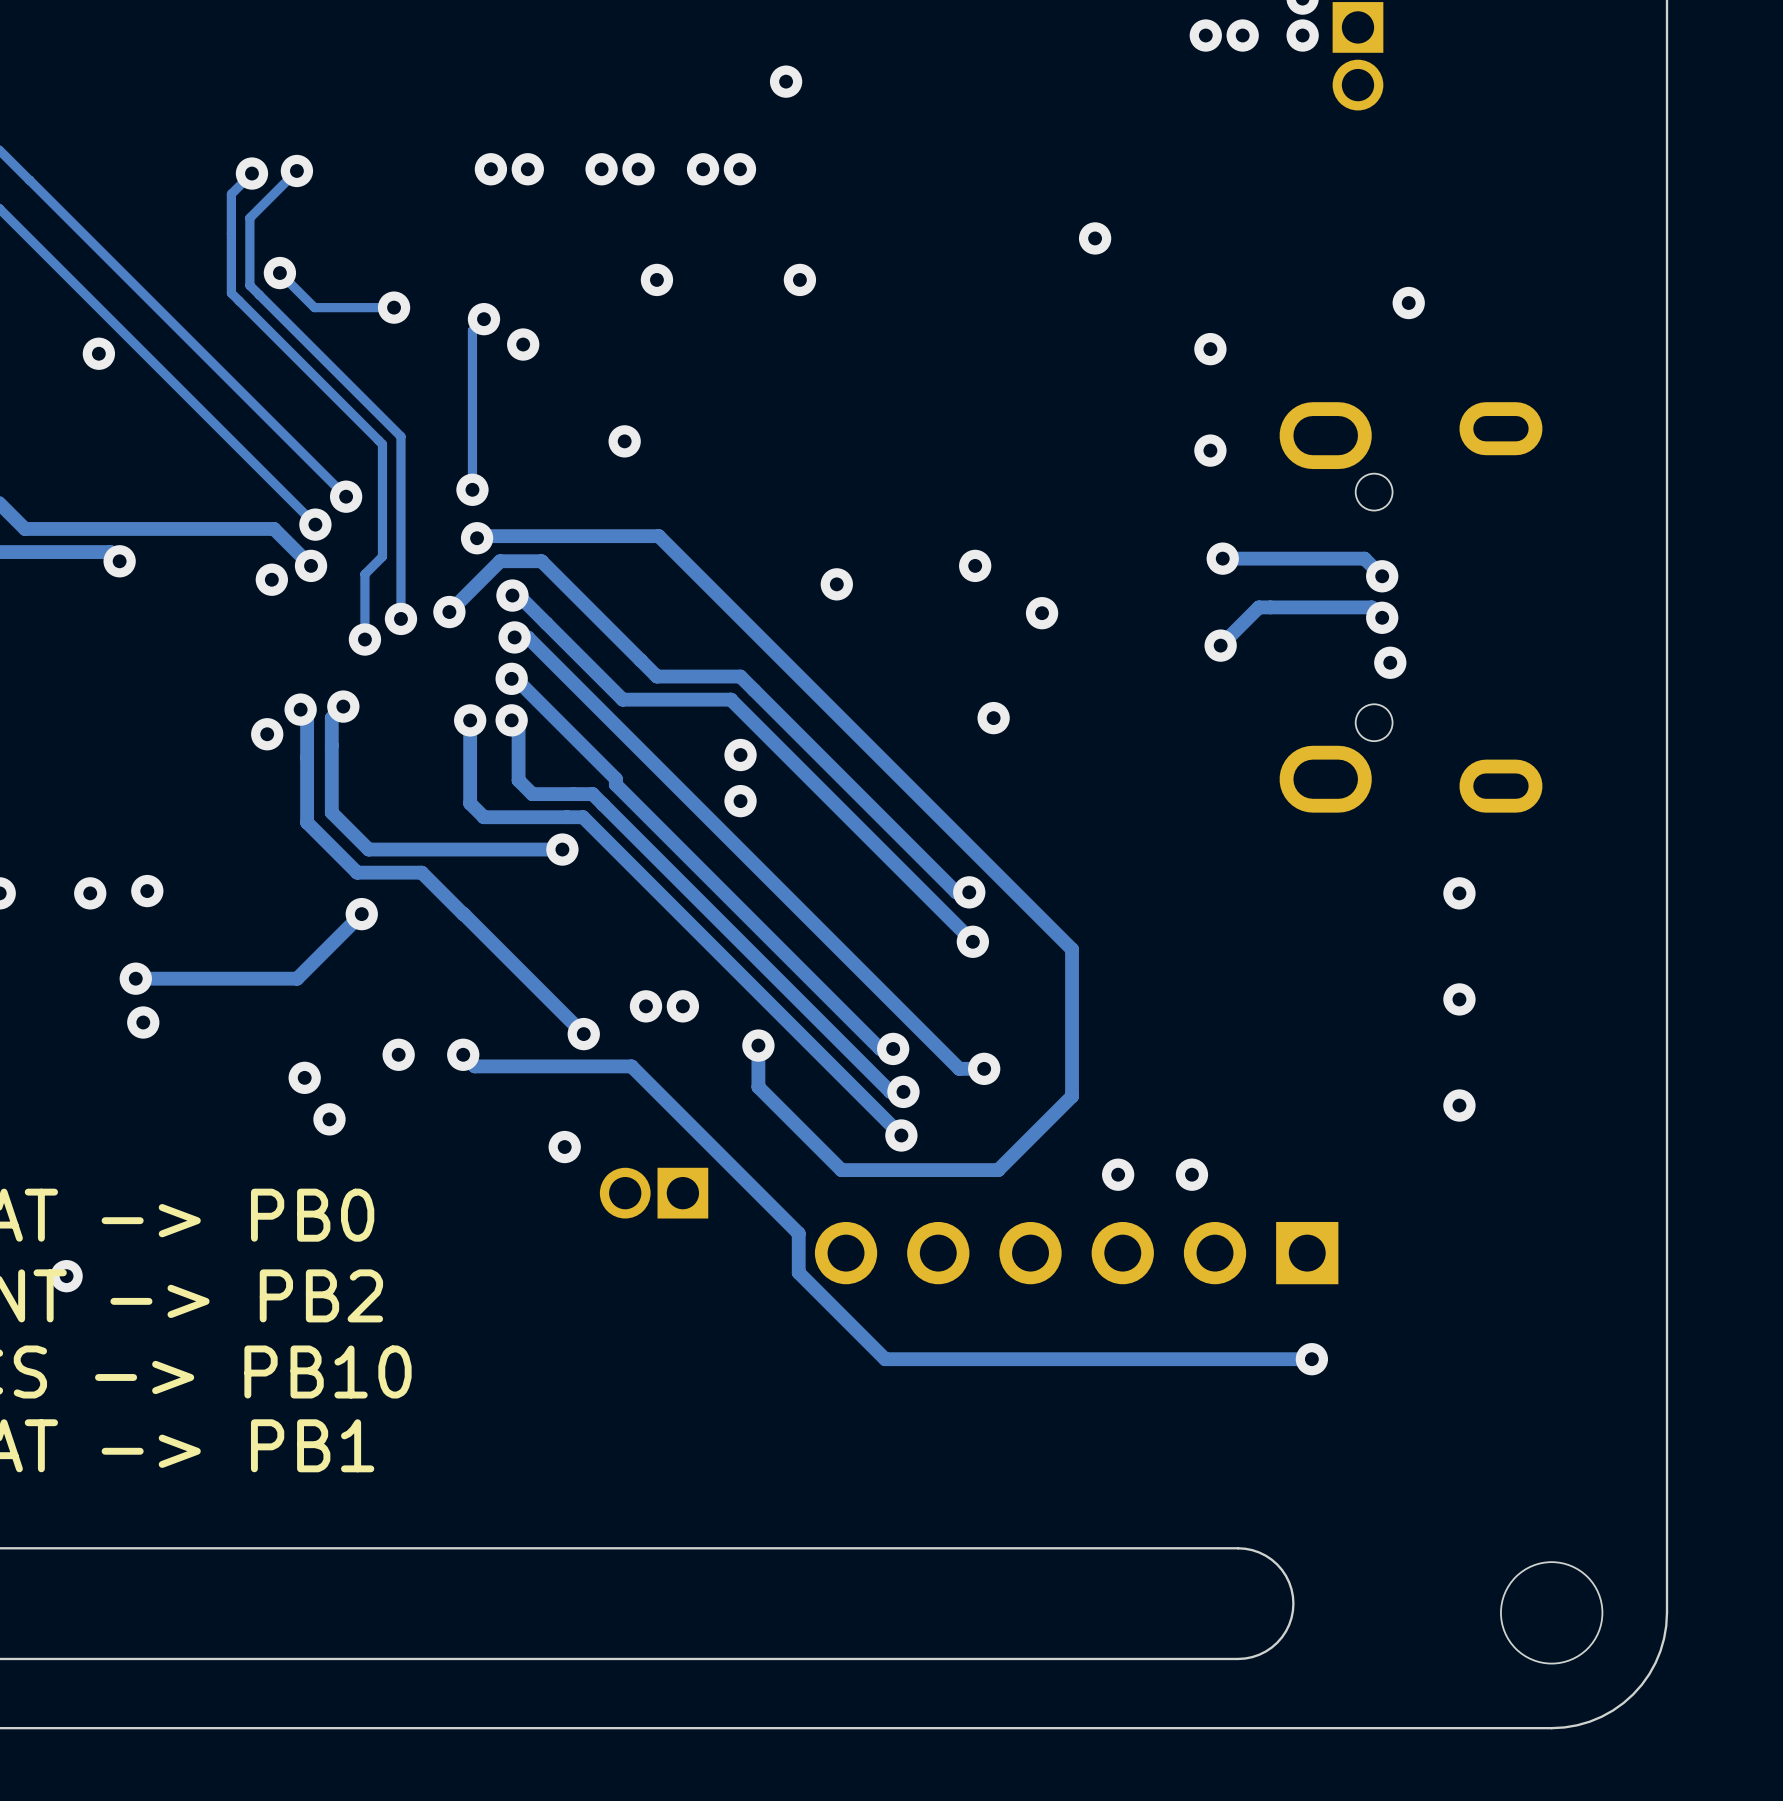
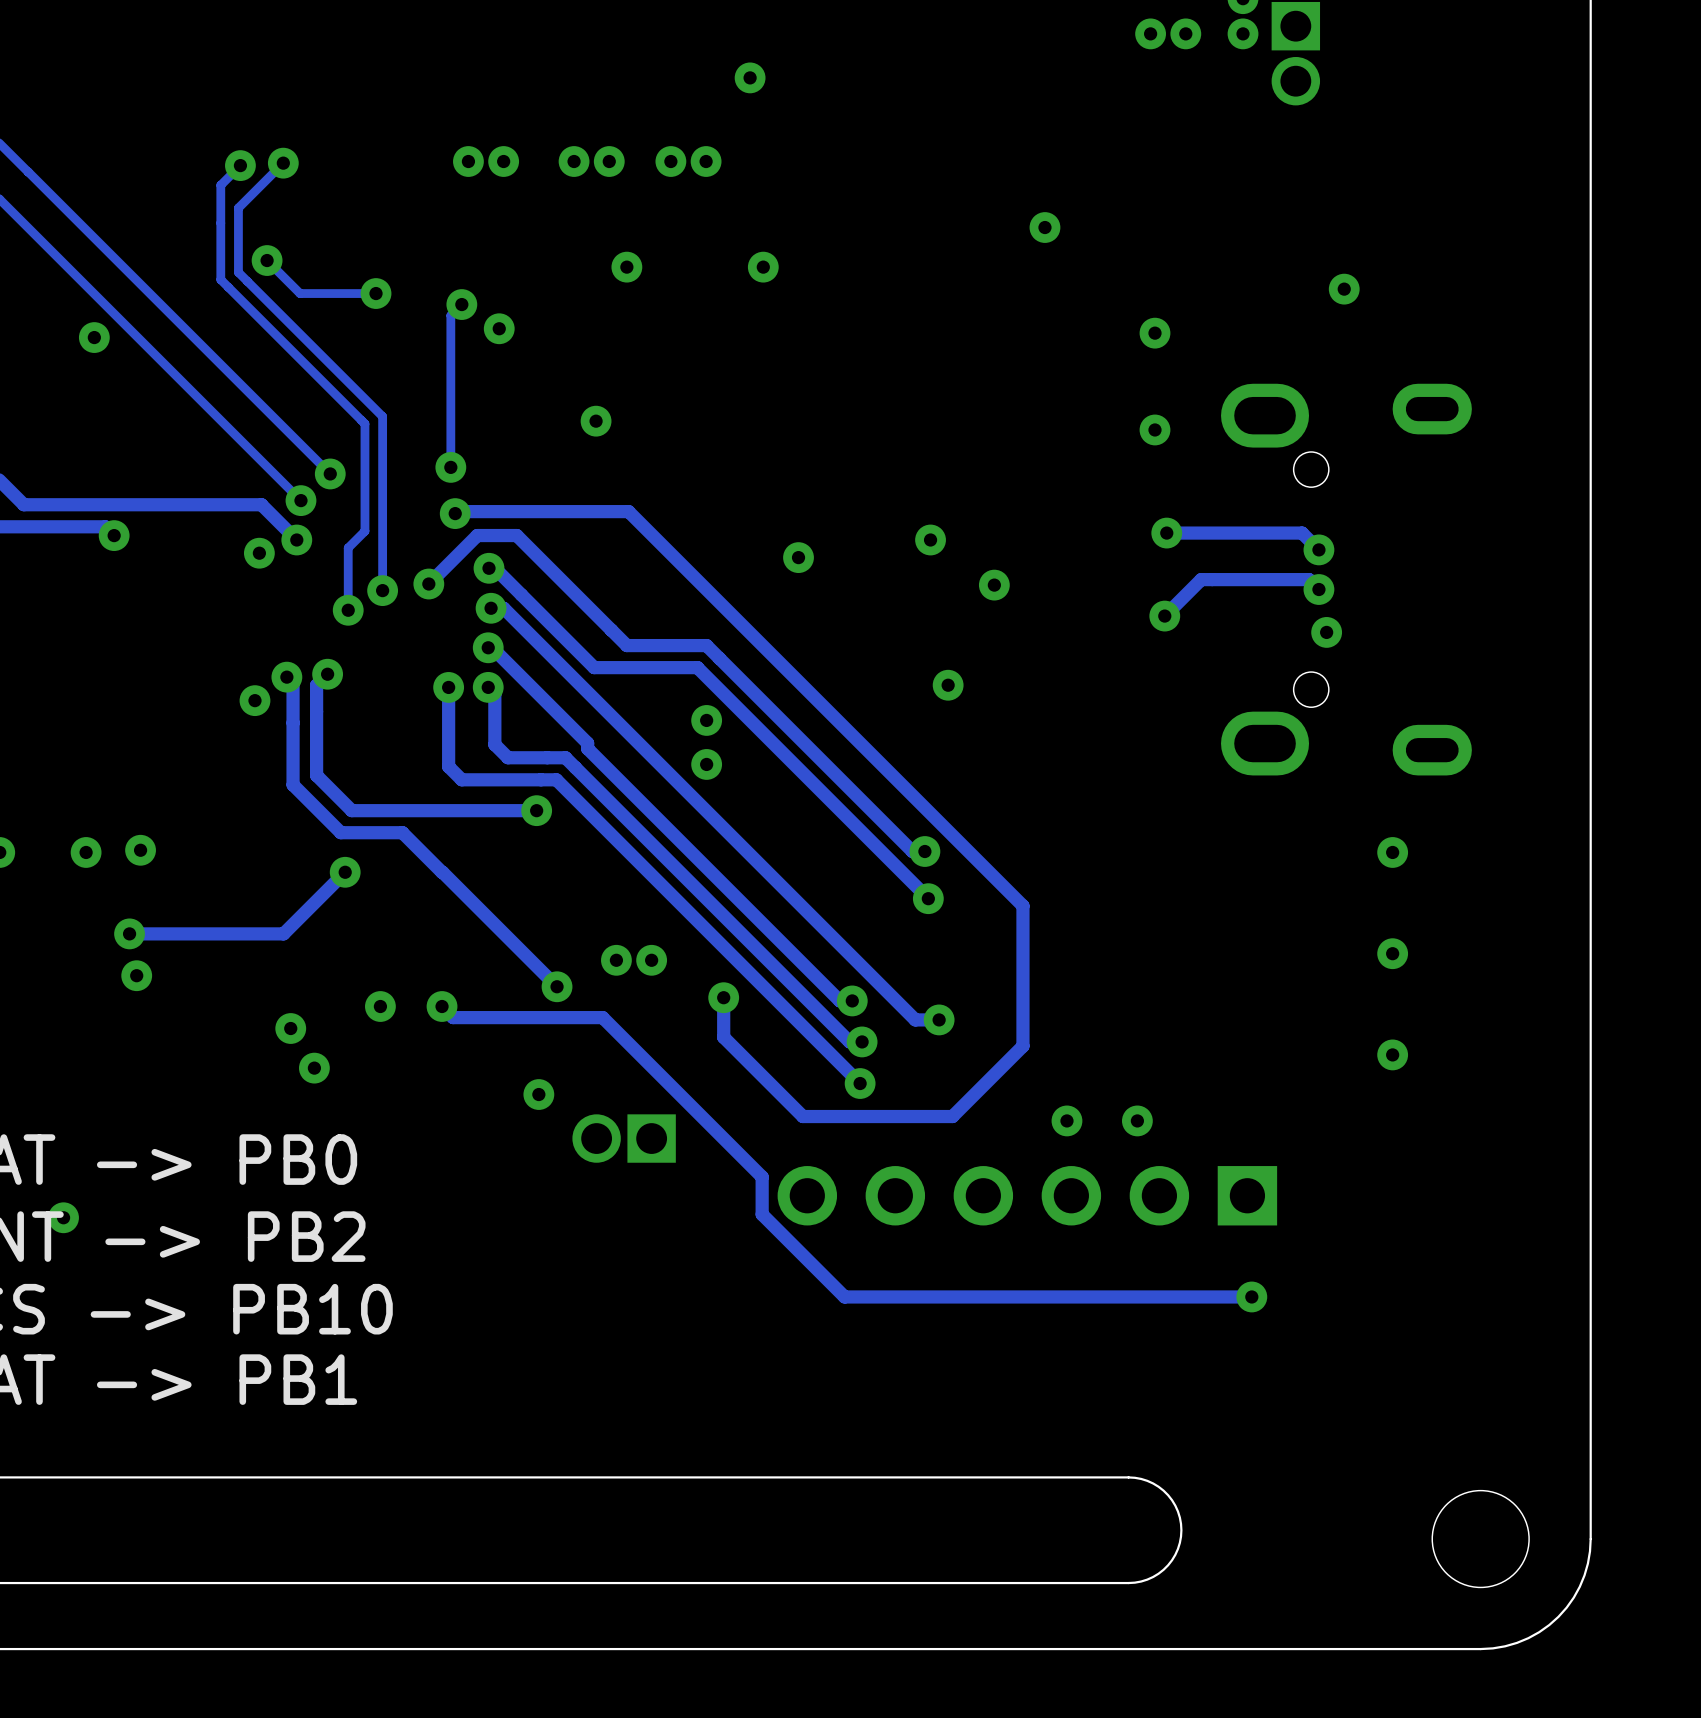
board edge: (1182, 1548) (1245, 1548) (1265, 1555) (1277, 1564) (1286, 1575) (1291, 1589) (1293, 1603) (1291, 1617) (1286, 1631) (1277, 1642) (1265, 1651) (1245, 1658) (1182, 1658) -> (1128, 1477) (1141, 1478) (1153, 1483) (1168, 1495) (1177, 1511) (1181, 1530) (1177, 1548) (1172, 1560) (1163, 1569) (1147, 1579) (1128, 1583)

